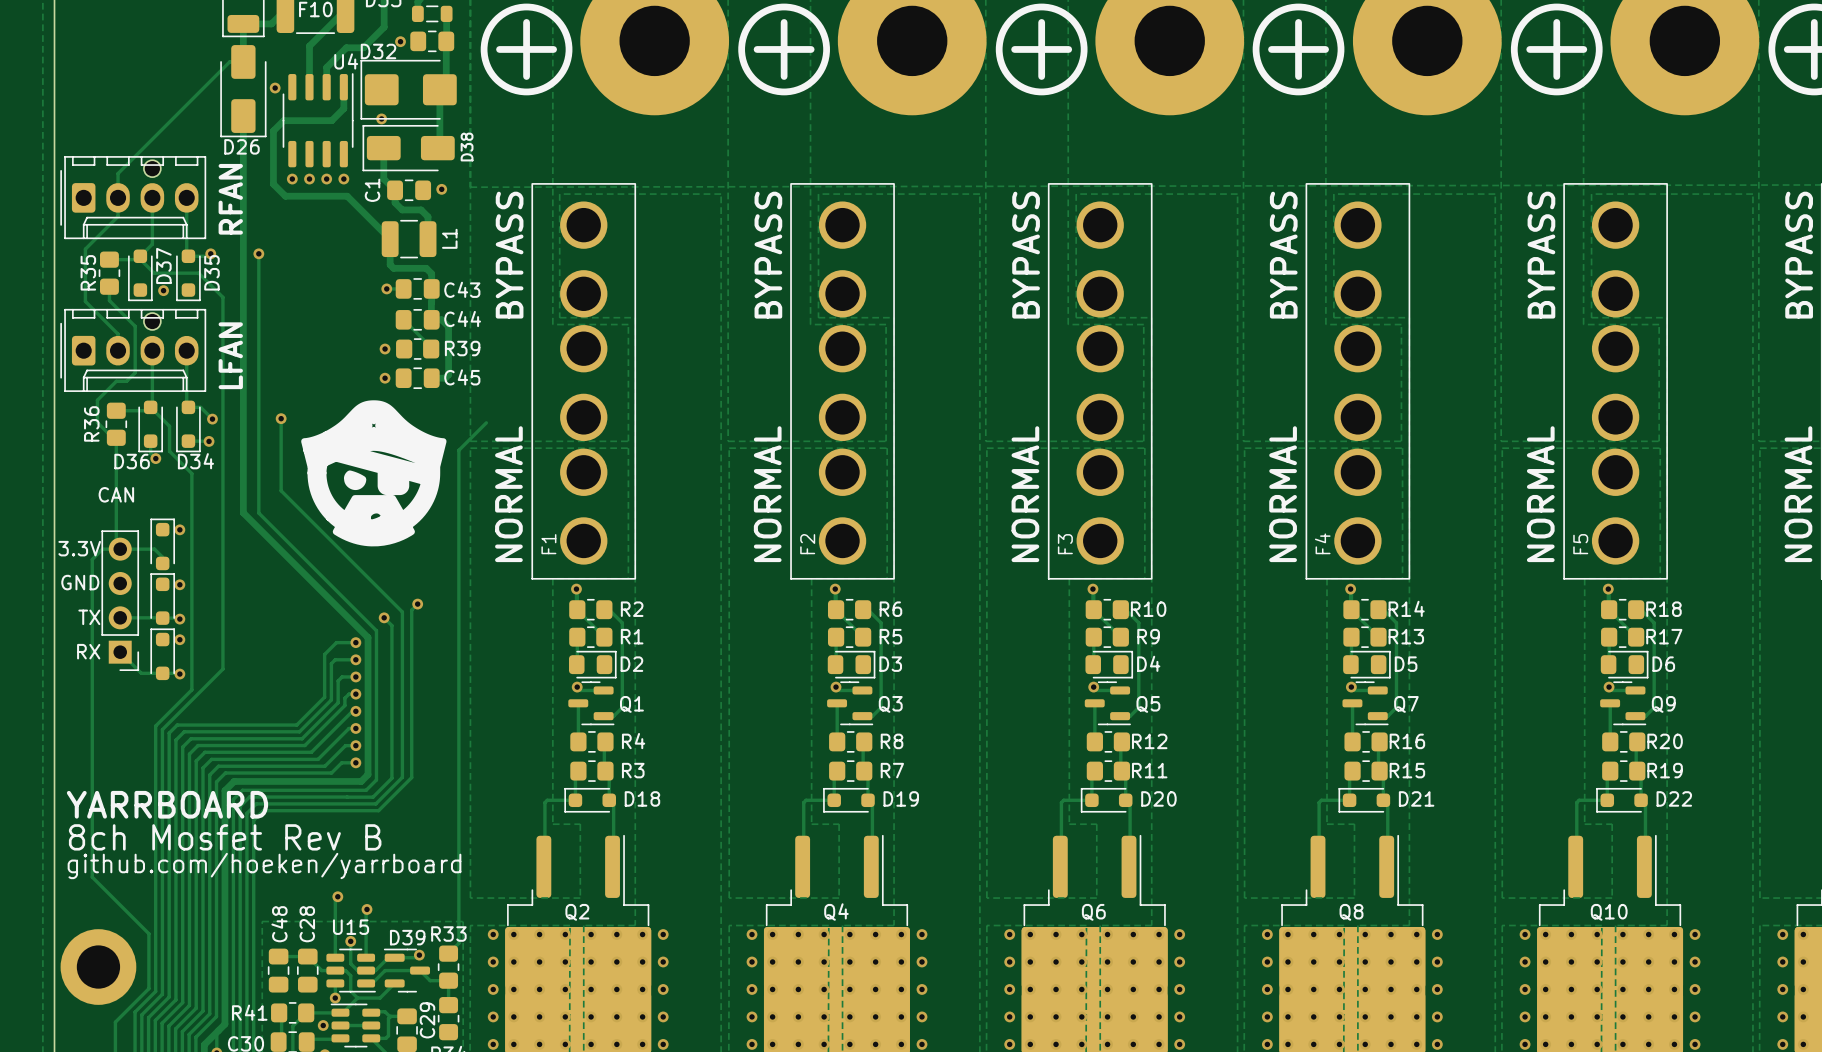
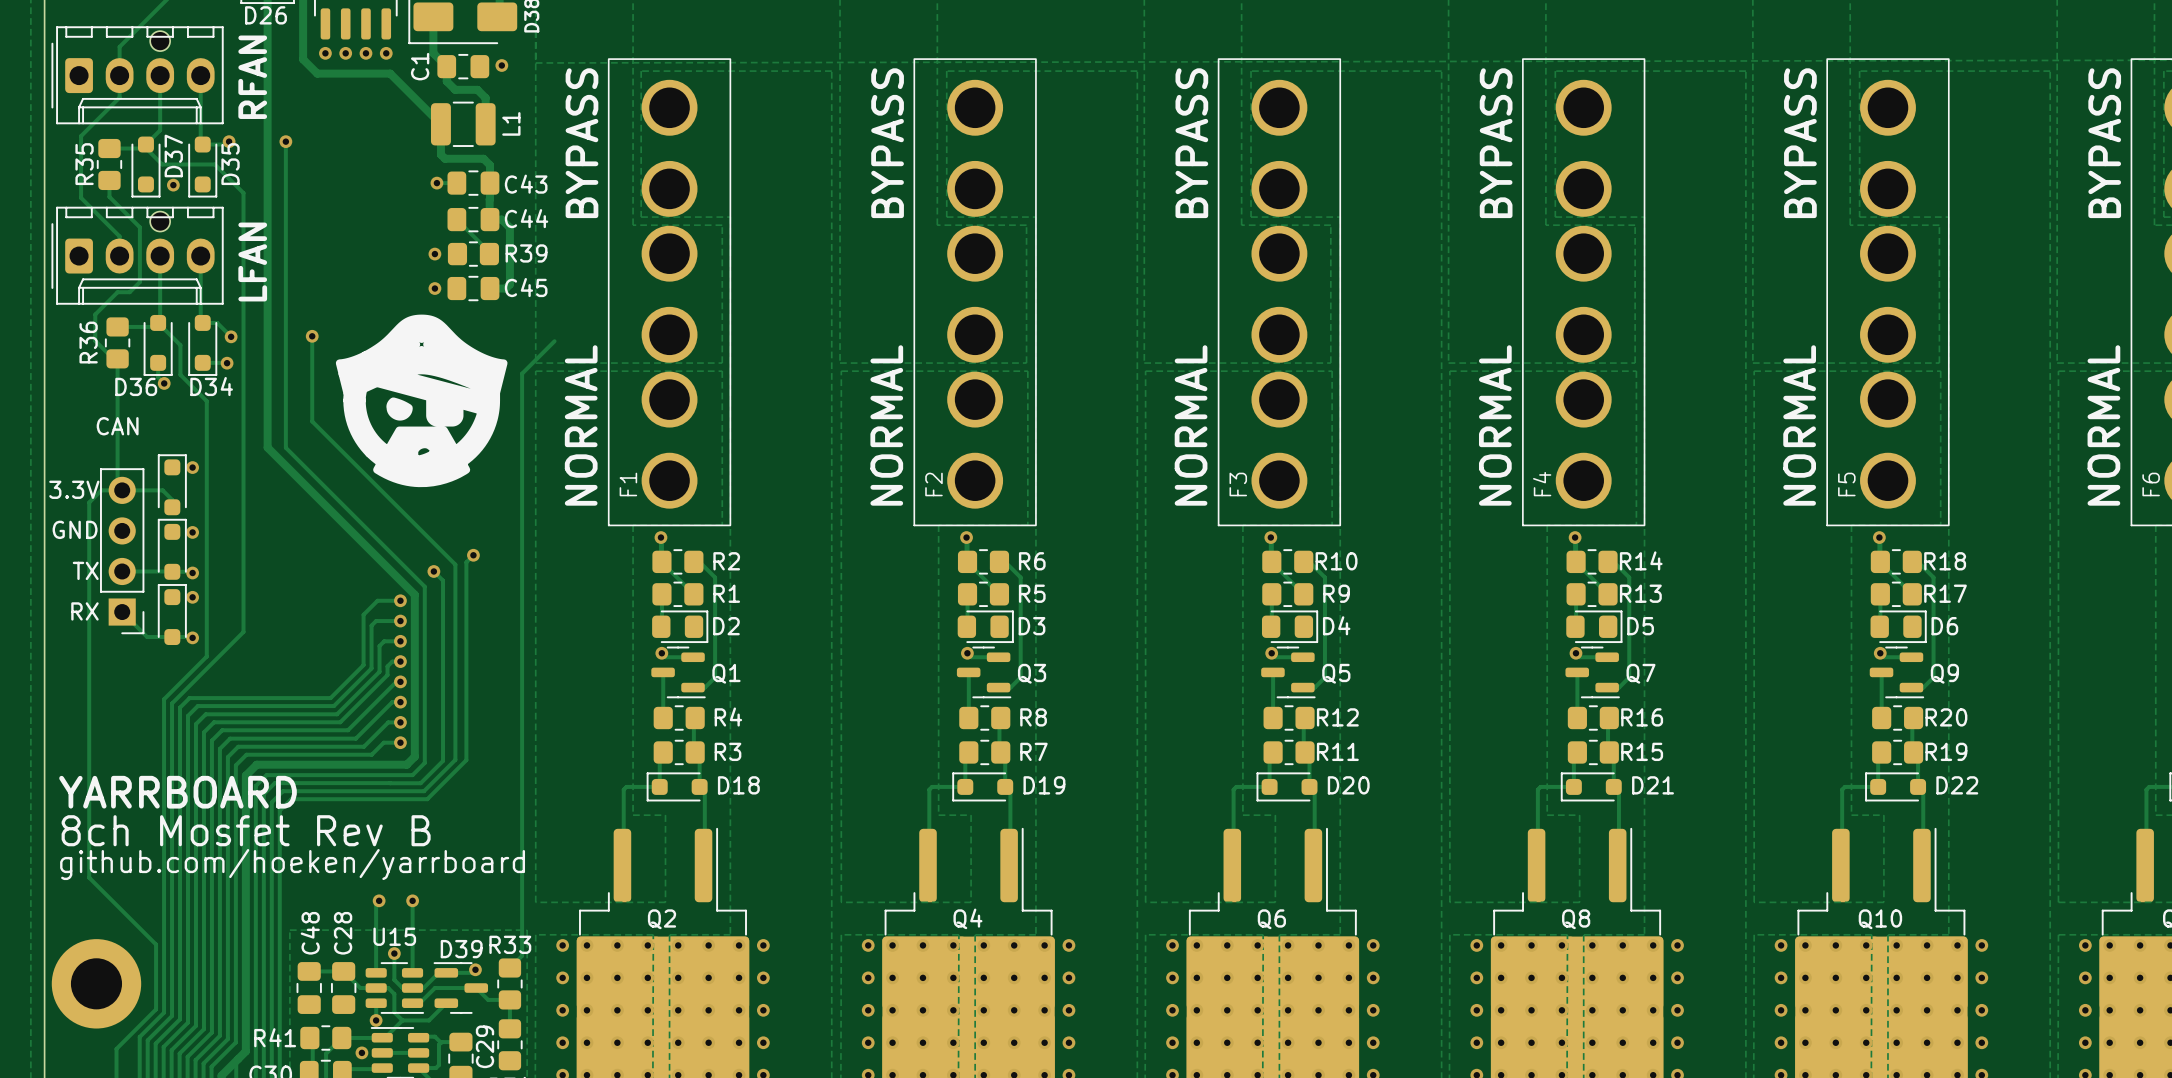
via position: (367, 909) -> (412, 900)

